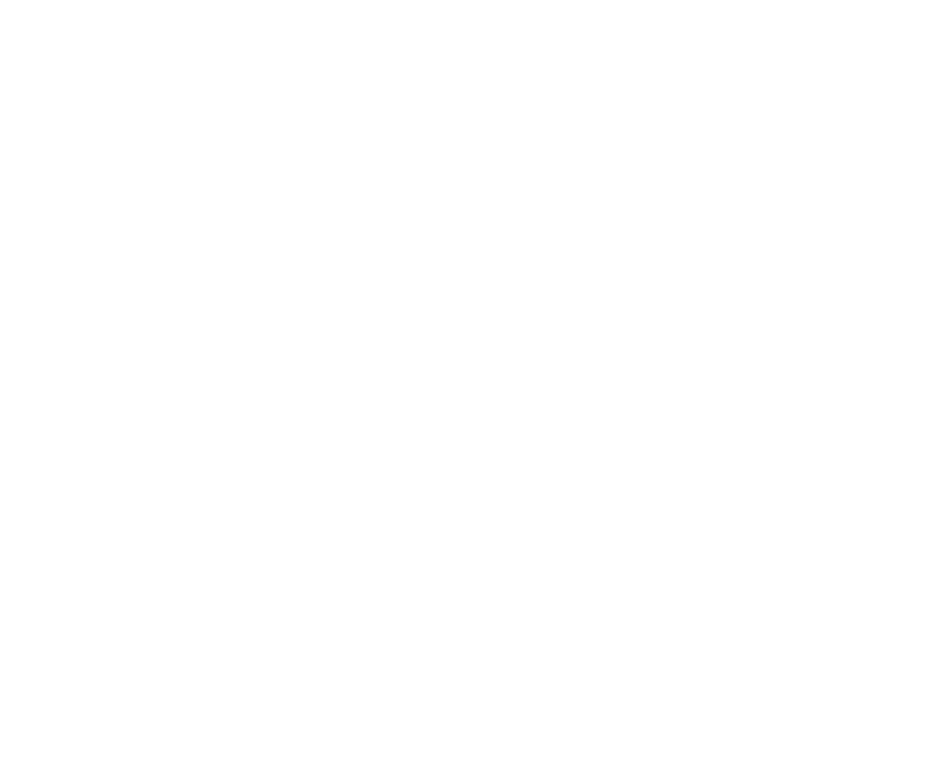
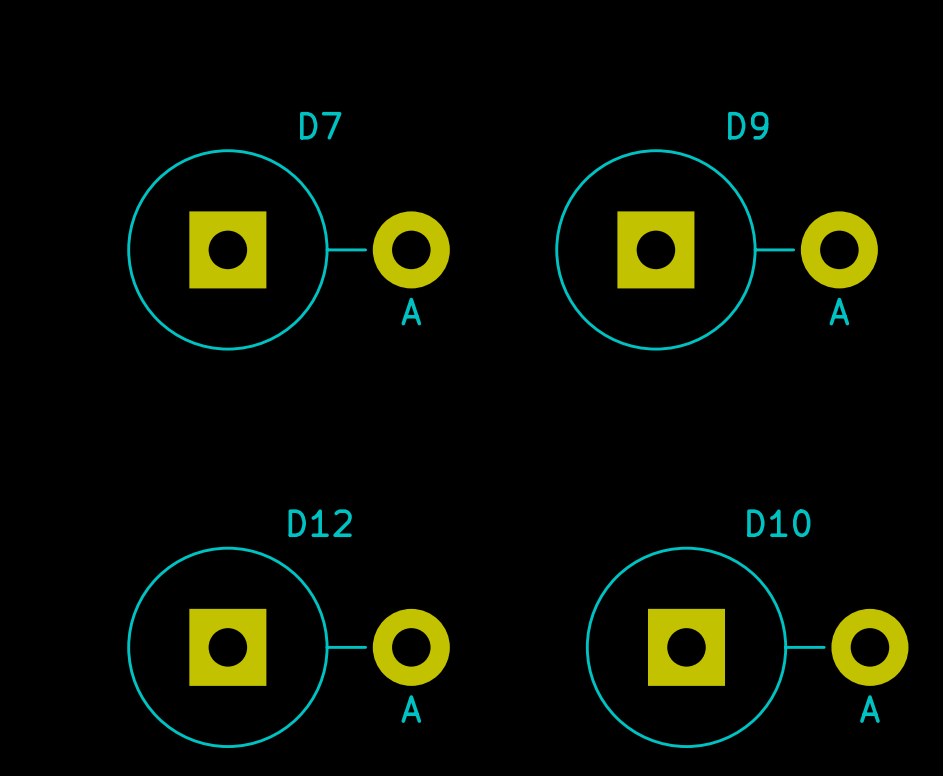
D7: none -> (288, 249)
D9: none -> (716, 249)
D12: none -> (288, 647)
D10: none -> (747, 647)

